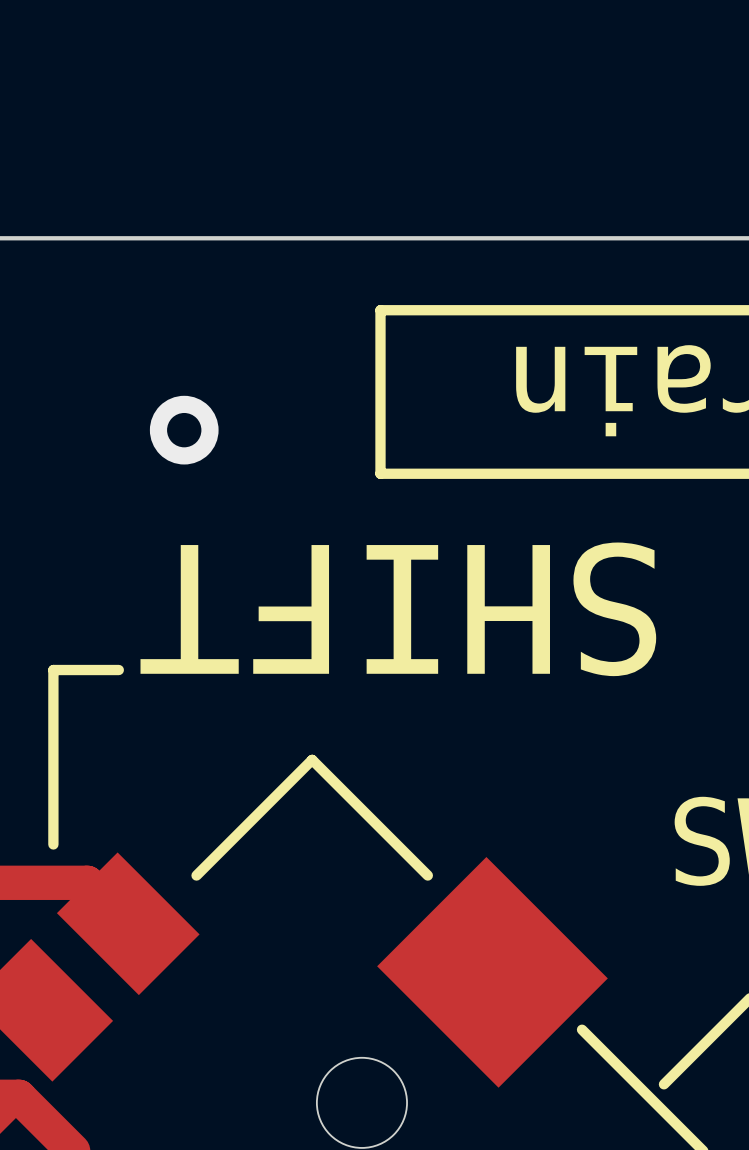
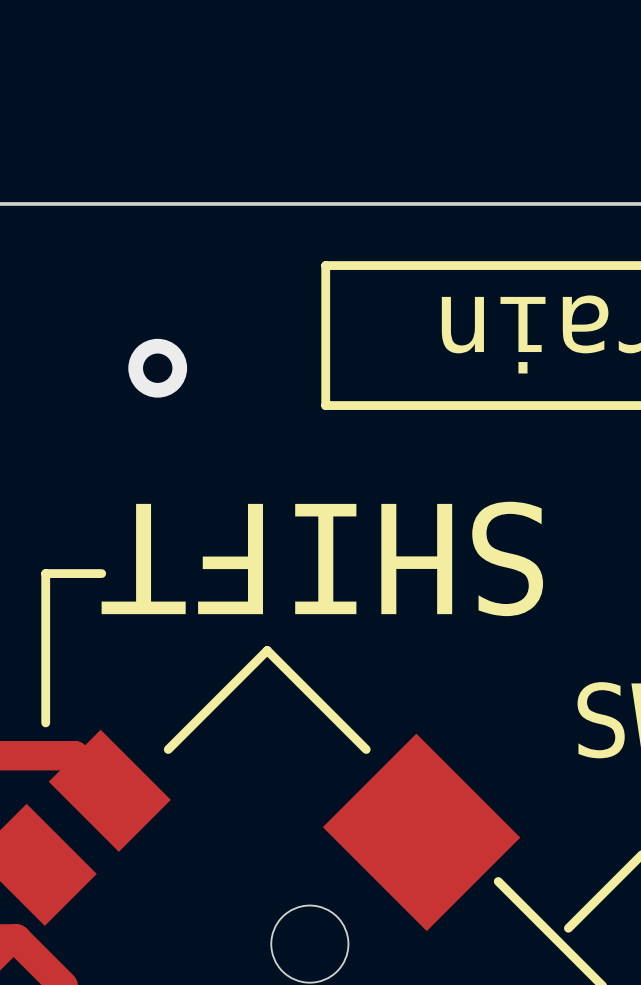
text position: SHIFT (398, 609) -> SHIFT (322, 558)

